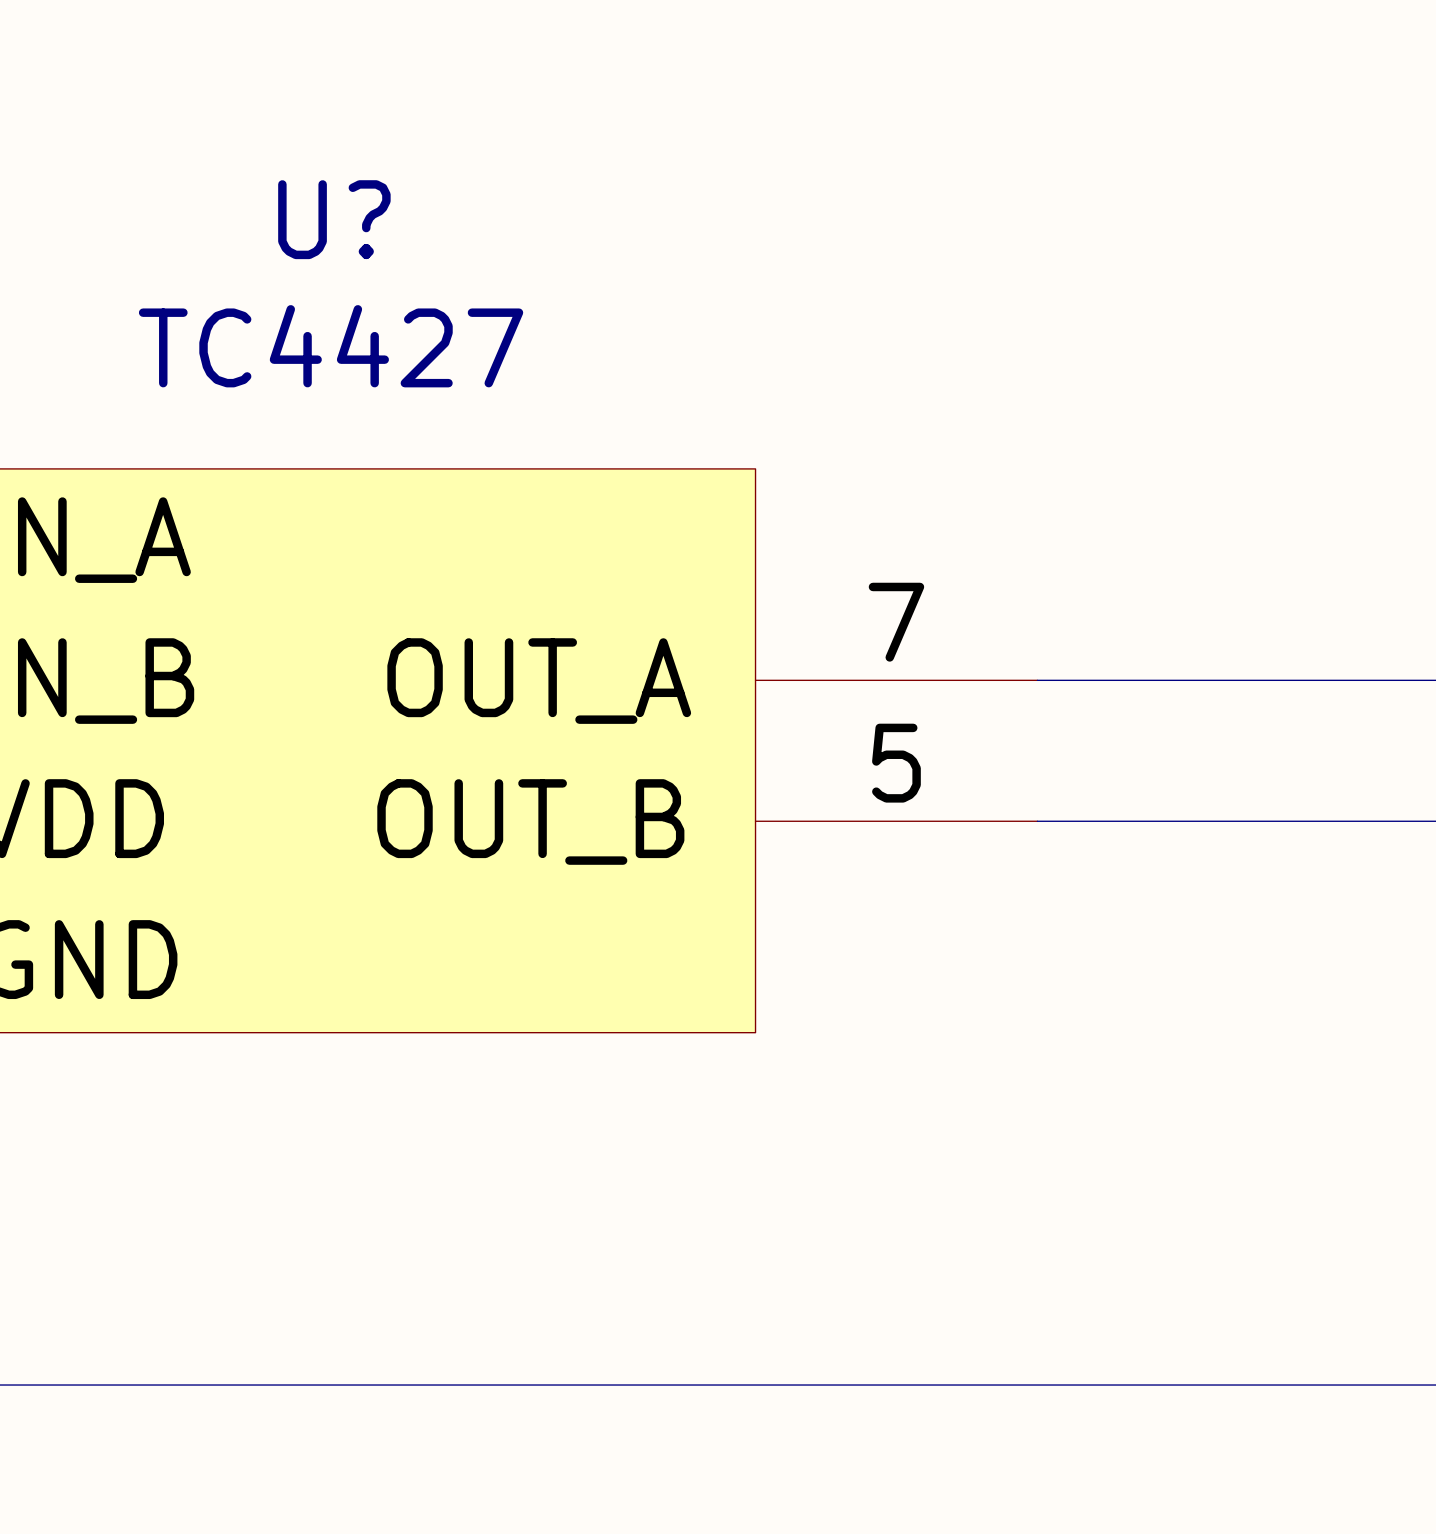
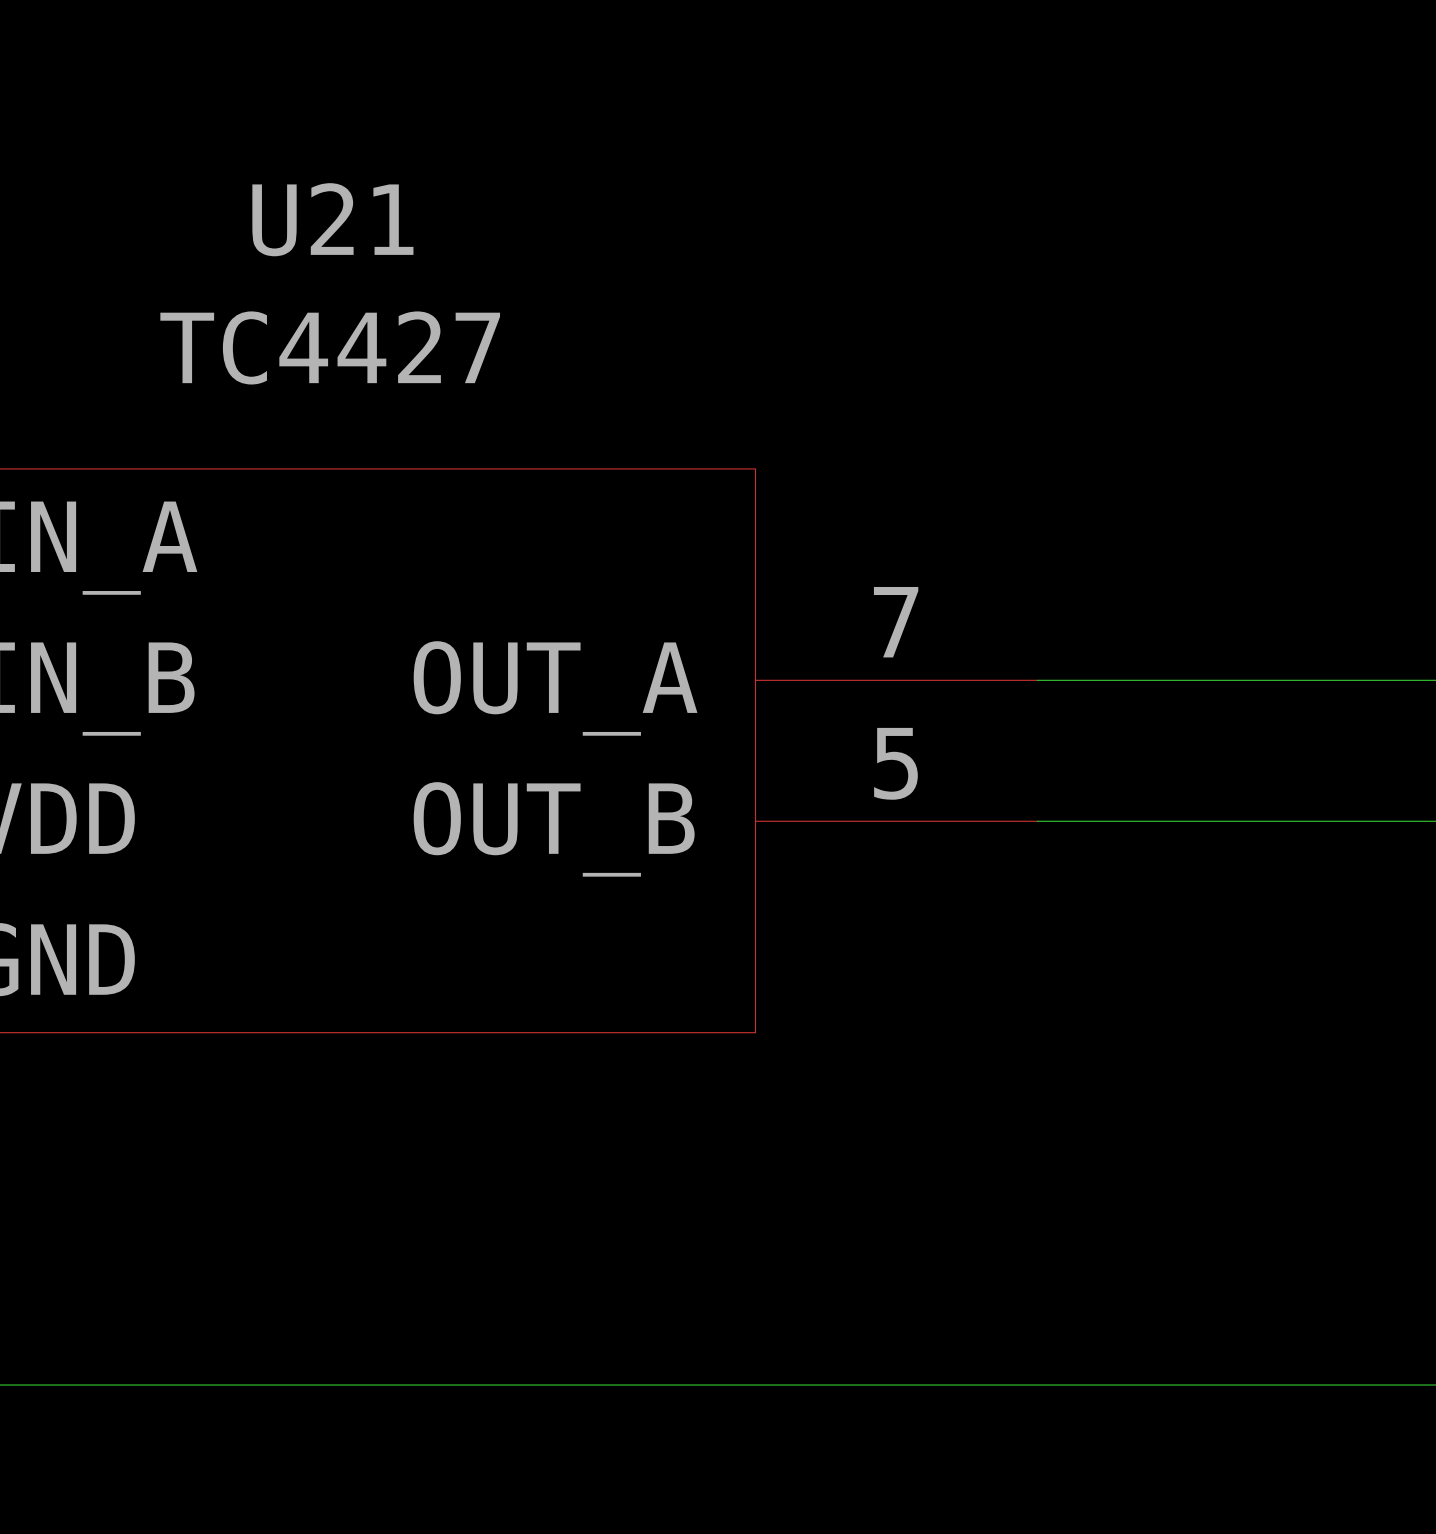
U? name: U? (334, 219) -> U21 (332, 219)

